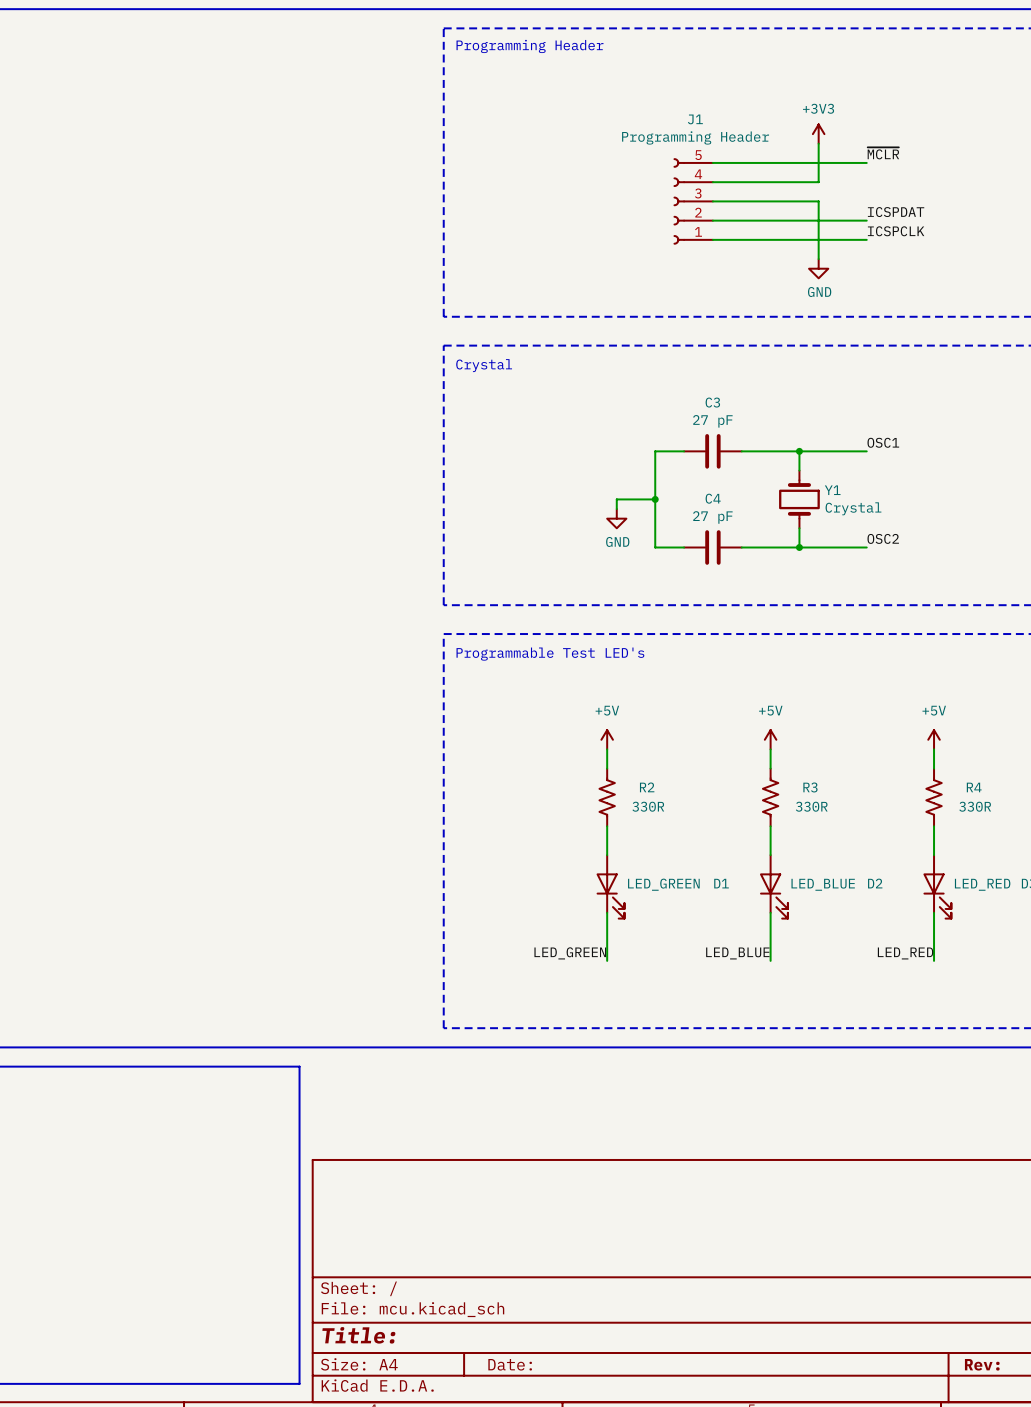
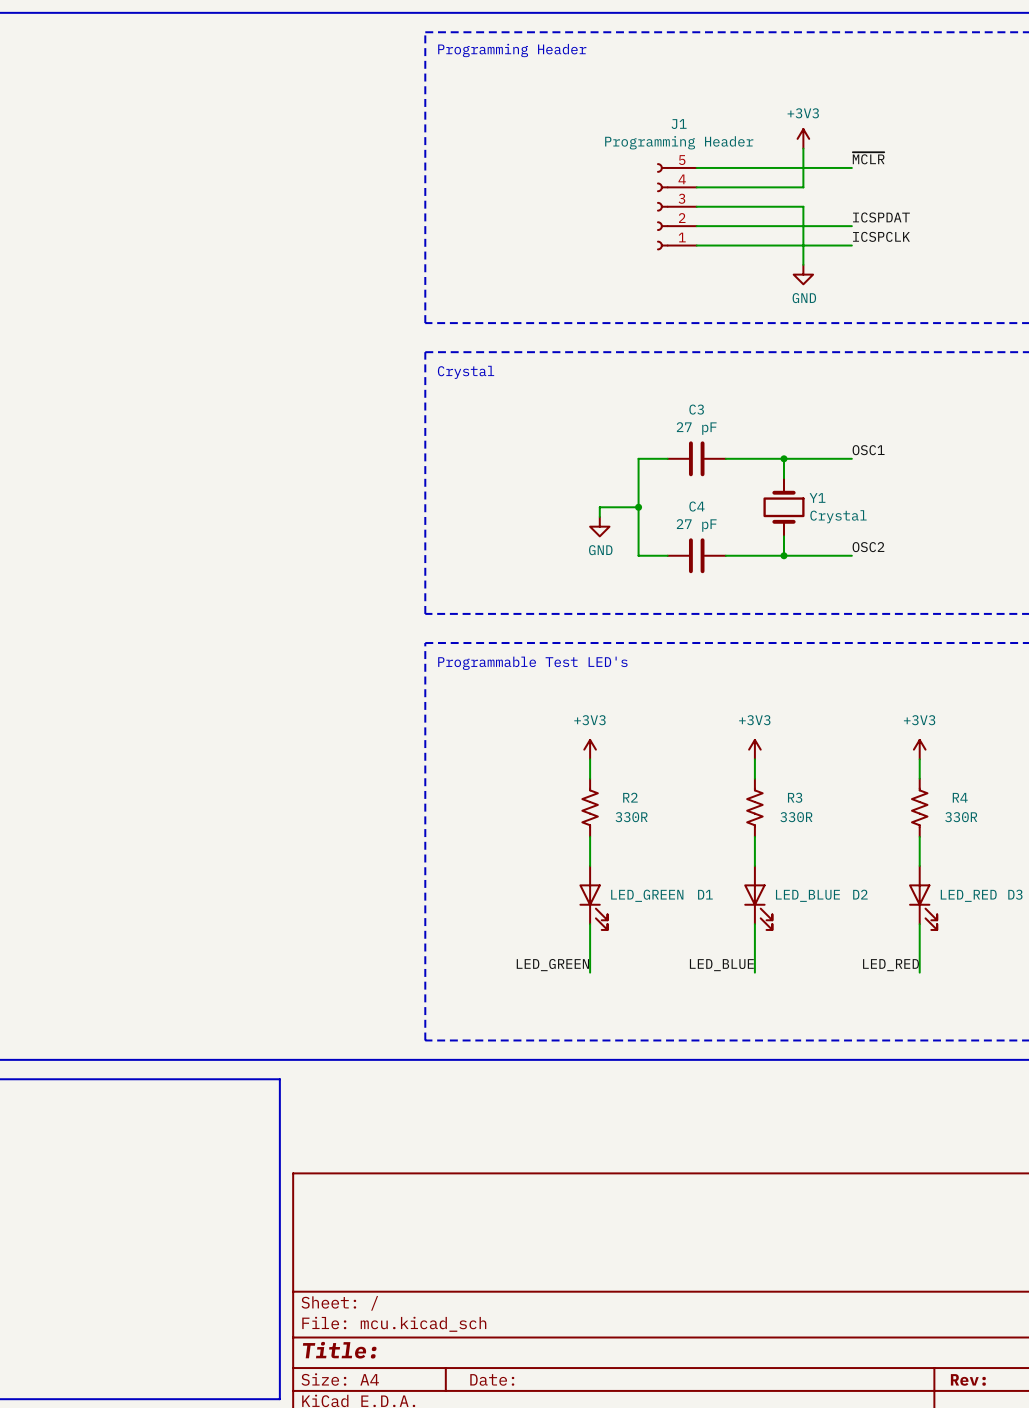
power symbol: +5V (607, 739) -> +3V3 (590, 749)
power symbol: +5V (770, 739) -> +3V3 (754, 749)
power symbol: +5V (934, 739) -> +3V3 (919, 749)

